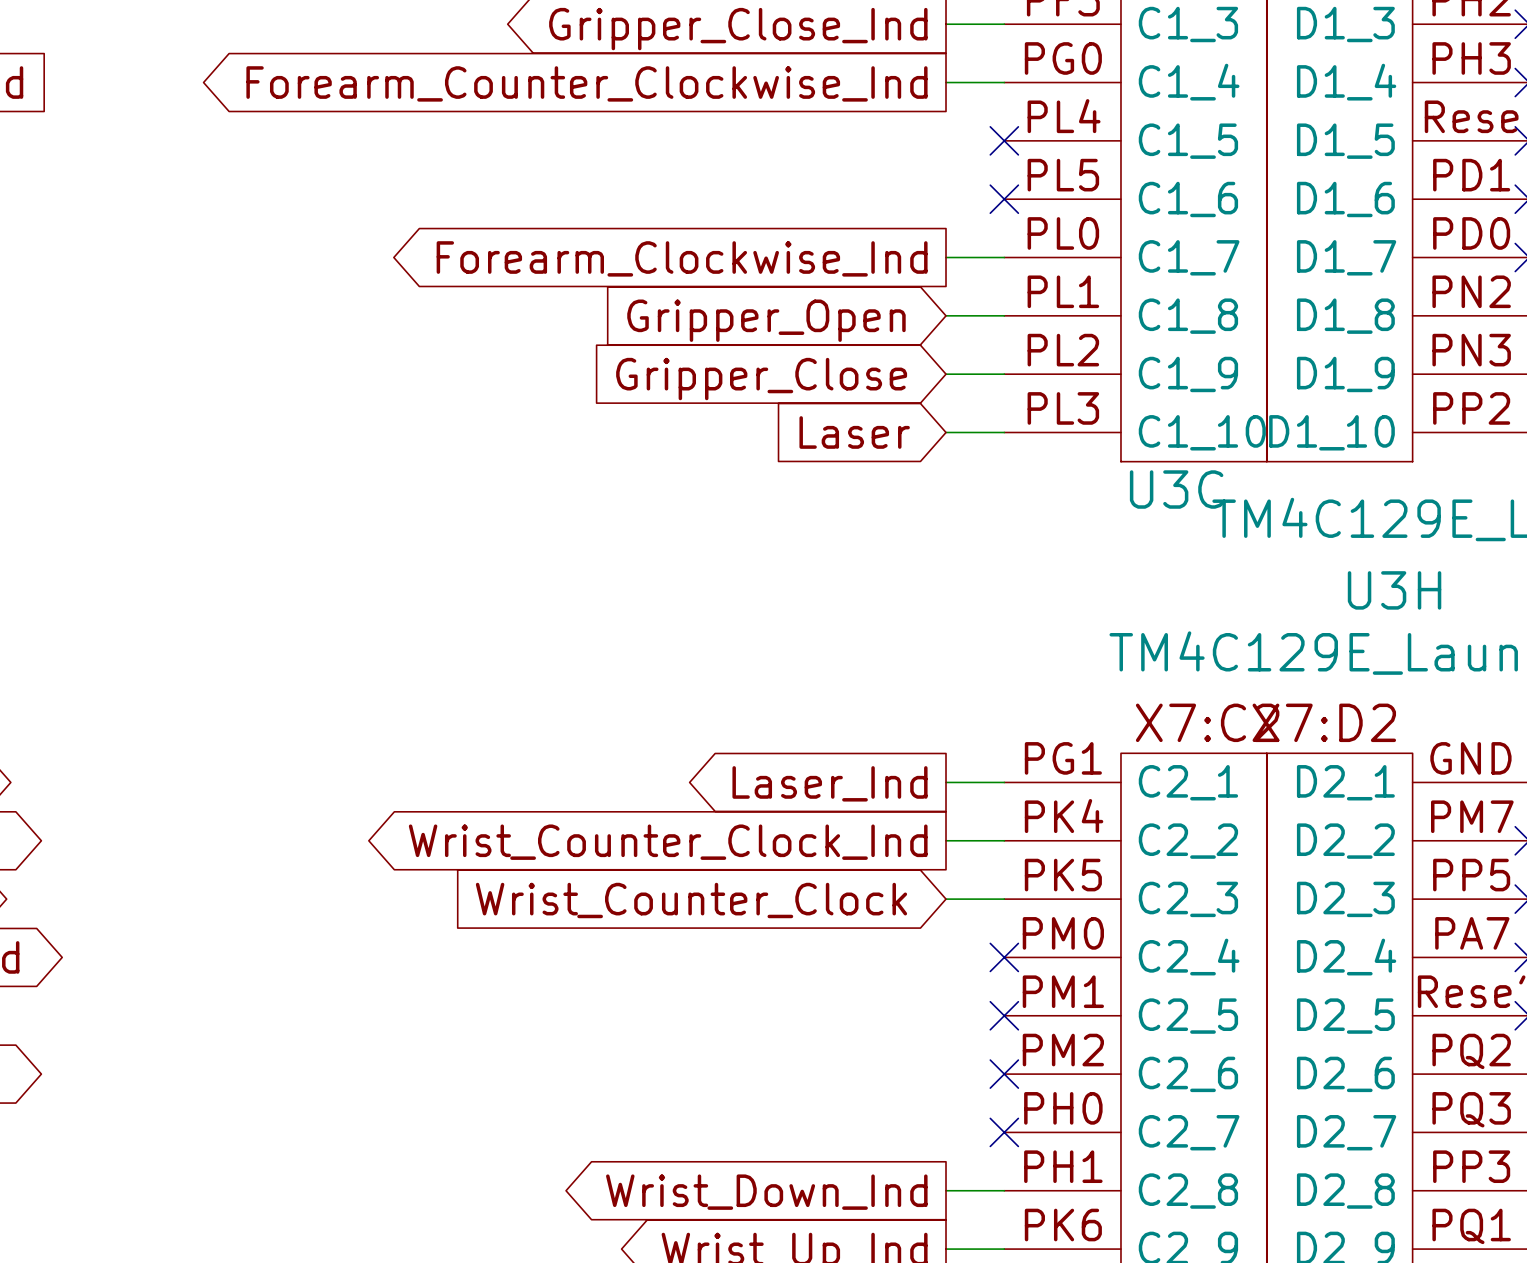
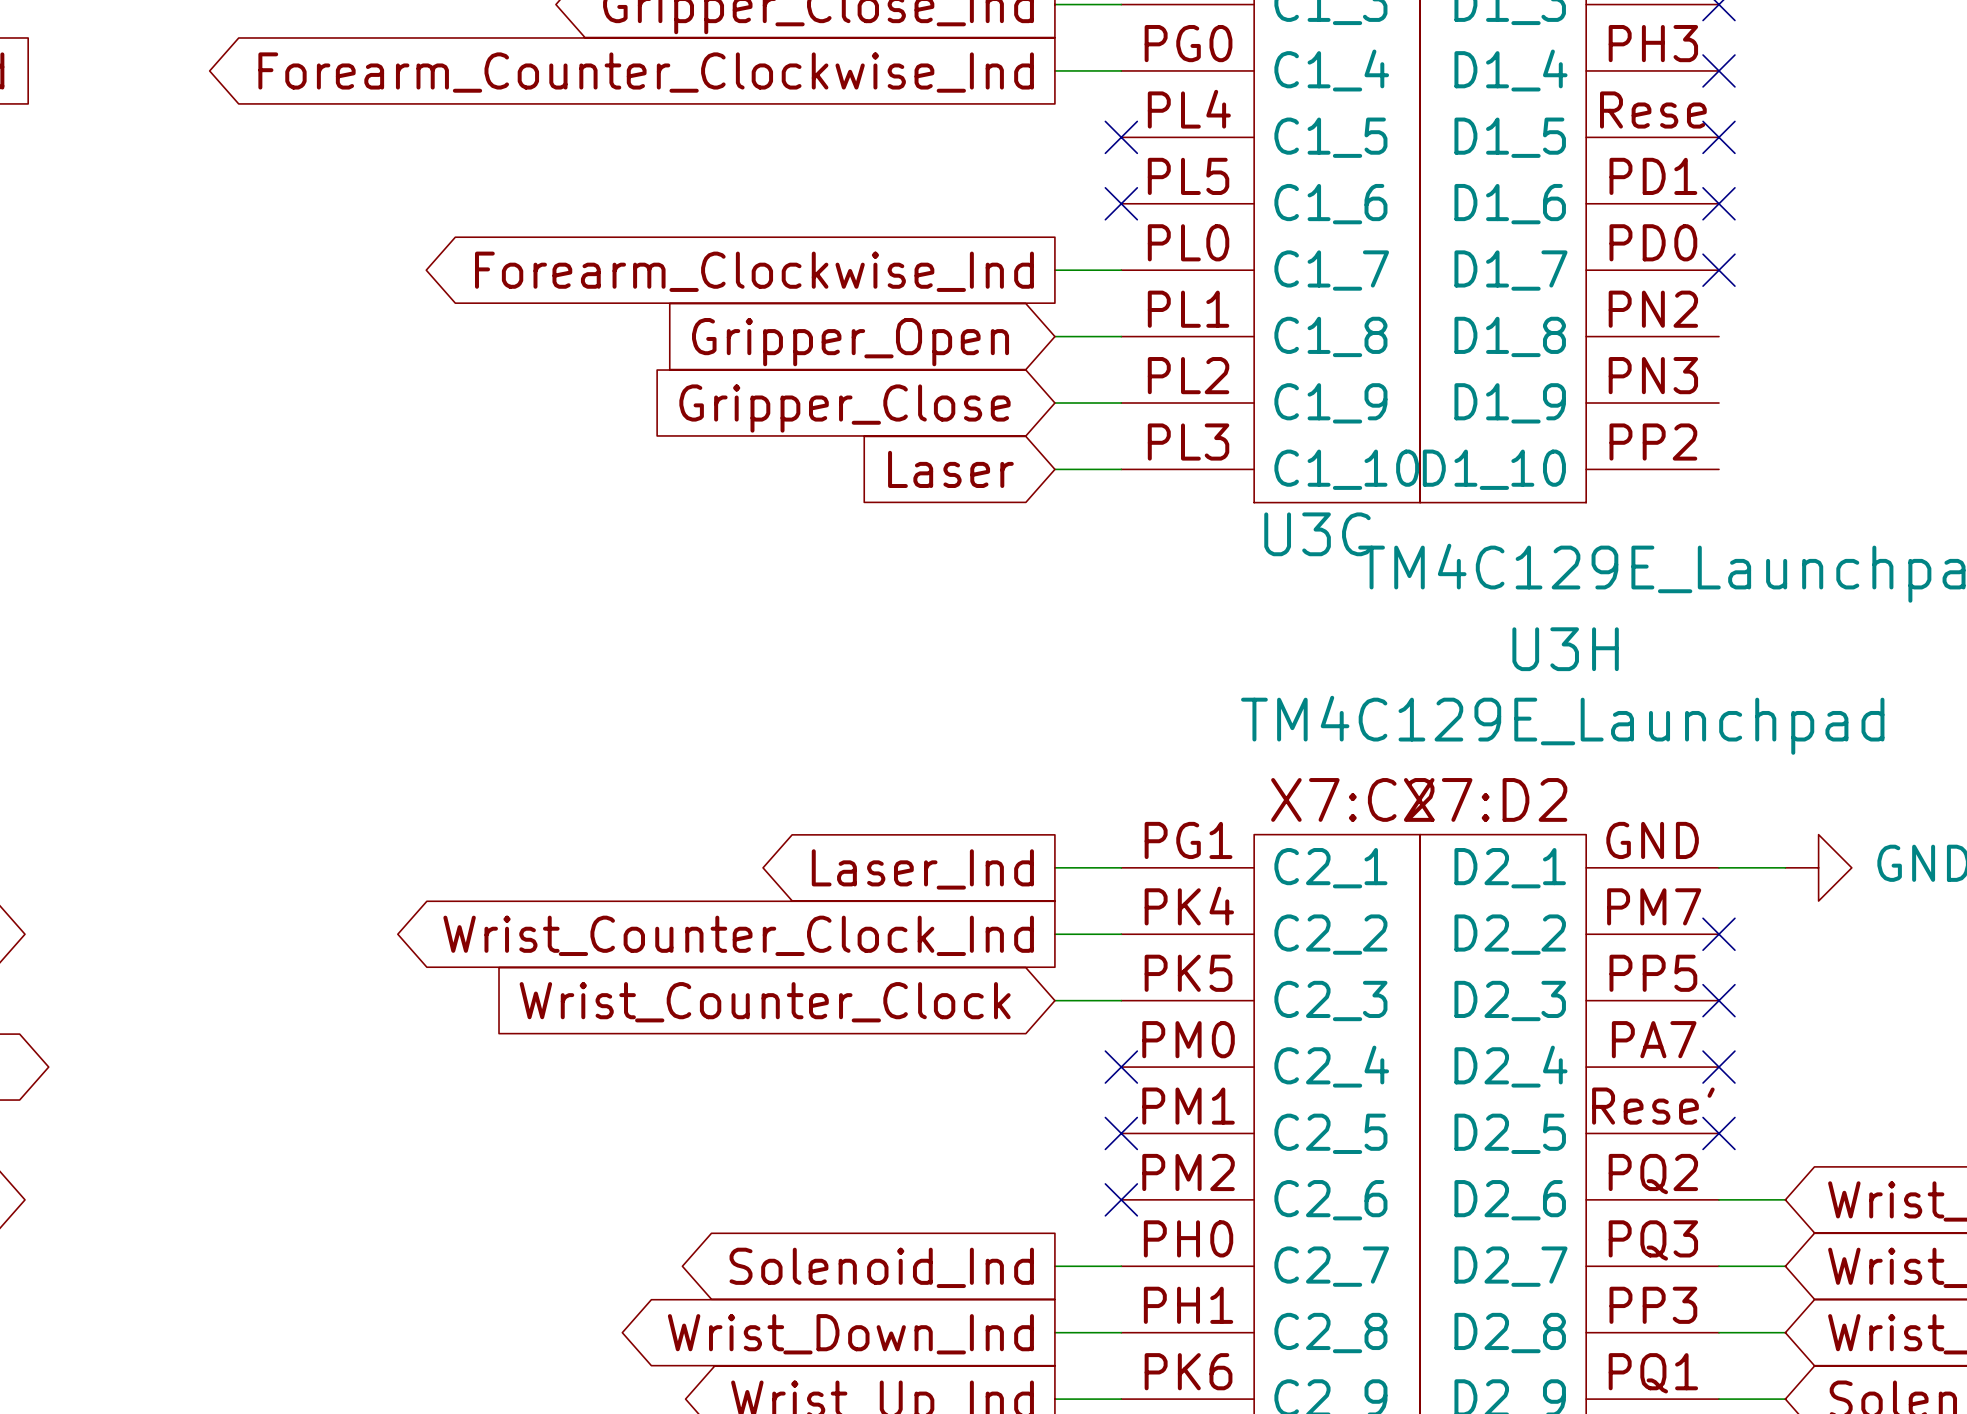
wire: none -> (1054, 1266) (1121, 1266)
no-connect mark: (1004, 1132) -> none
global label: none -> Solenoid_Ind (881, 1267)

